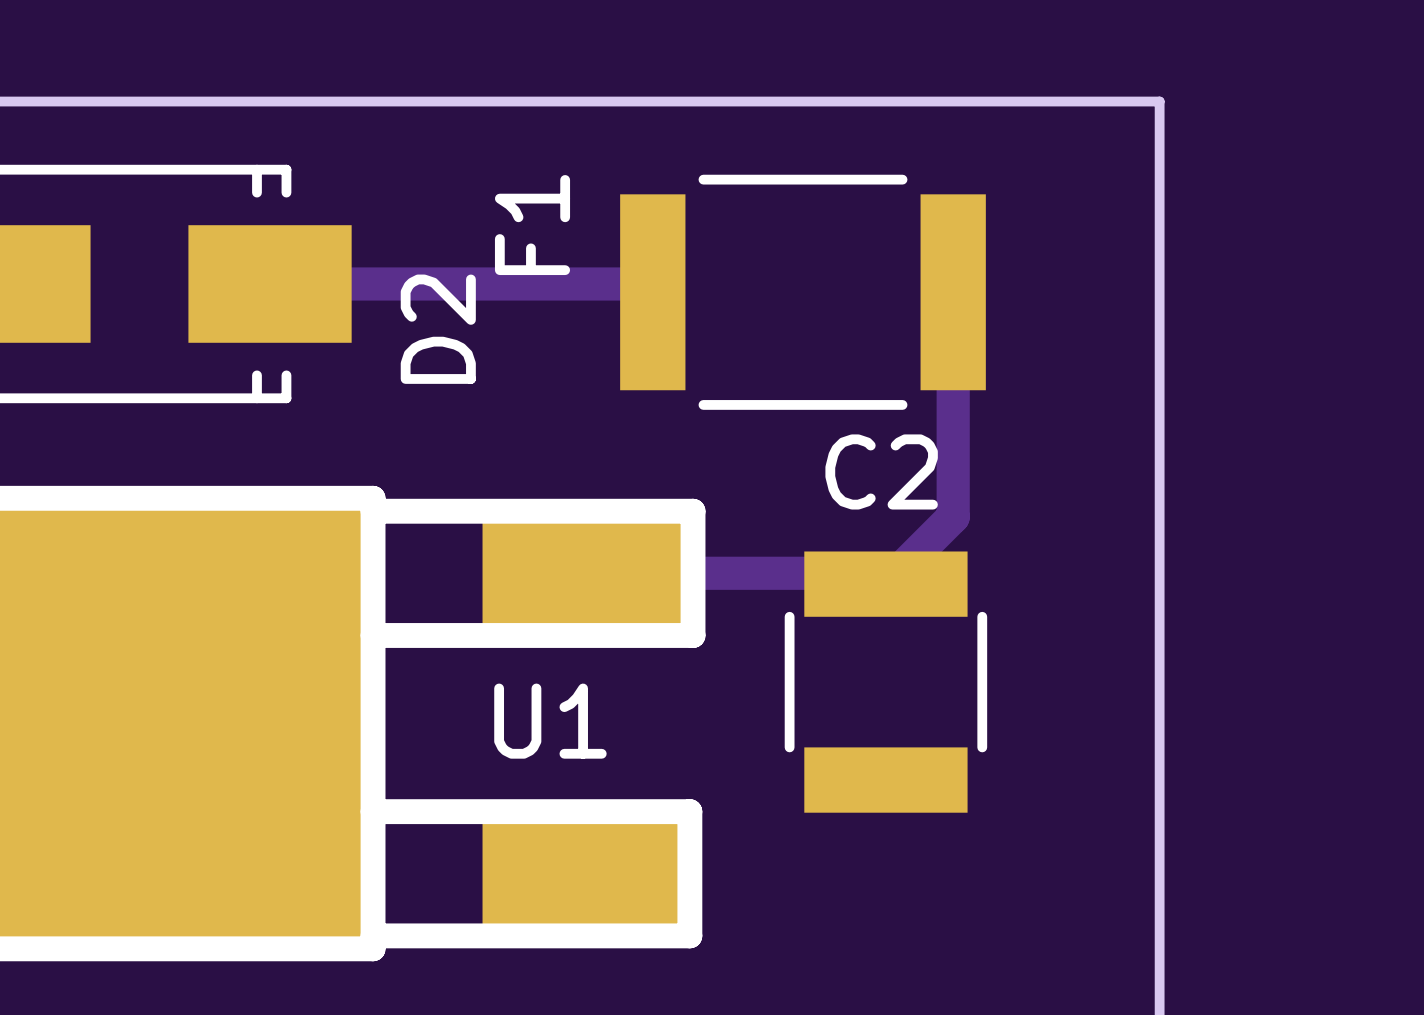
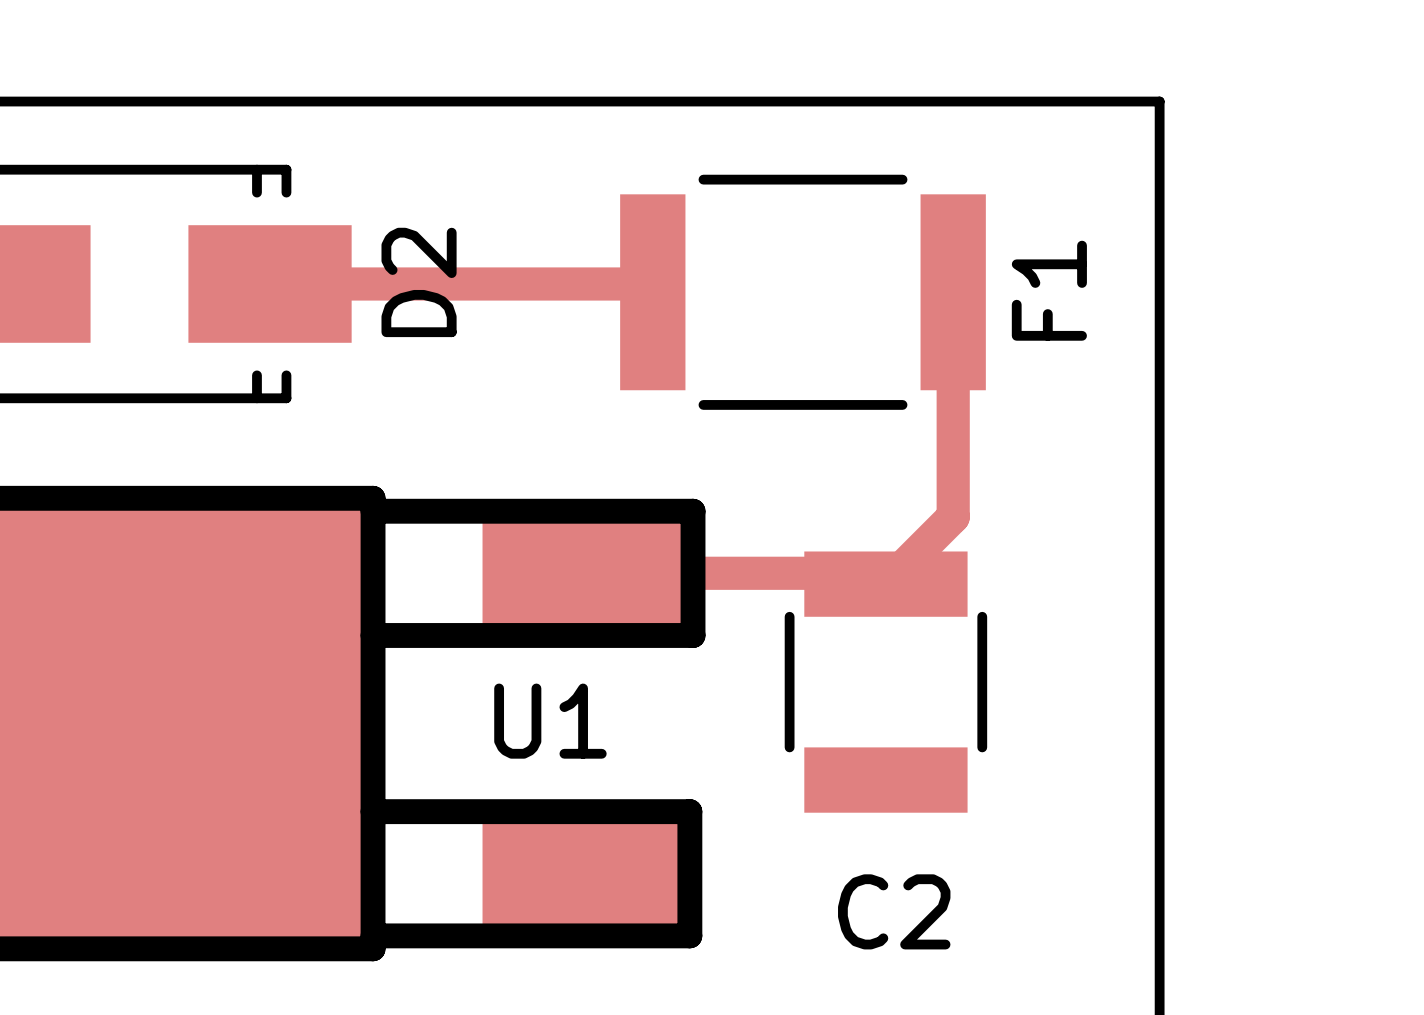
F1 name position: F1 (532, 225) -> F1 (1049, 290)
D2 name position: D2 (438, 329) -> D2 (419, 282)
C2 name position: C2 (881, 471) -> C2 (894, 911)

